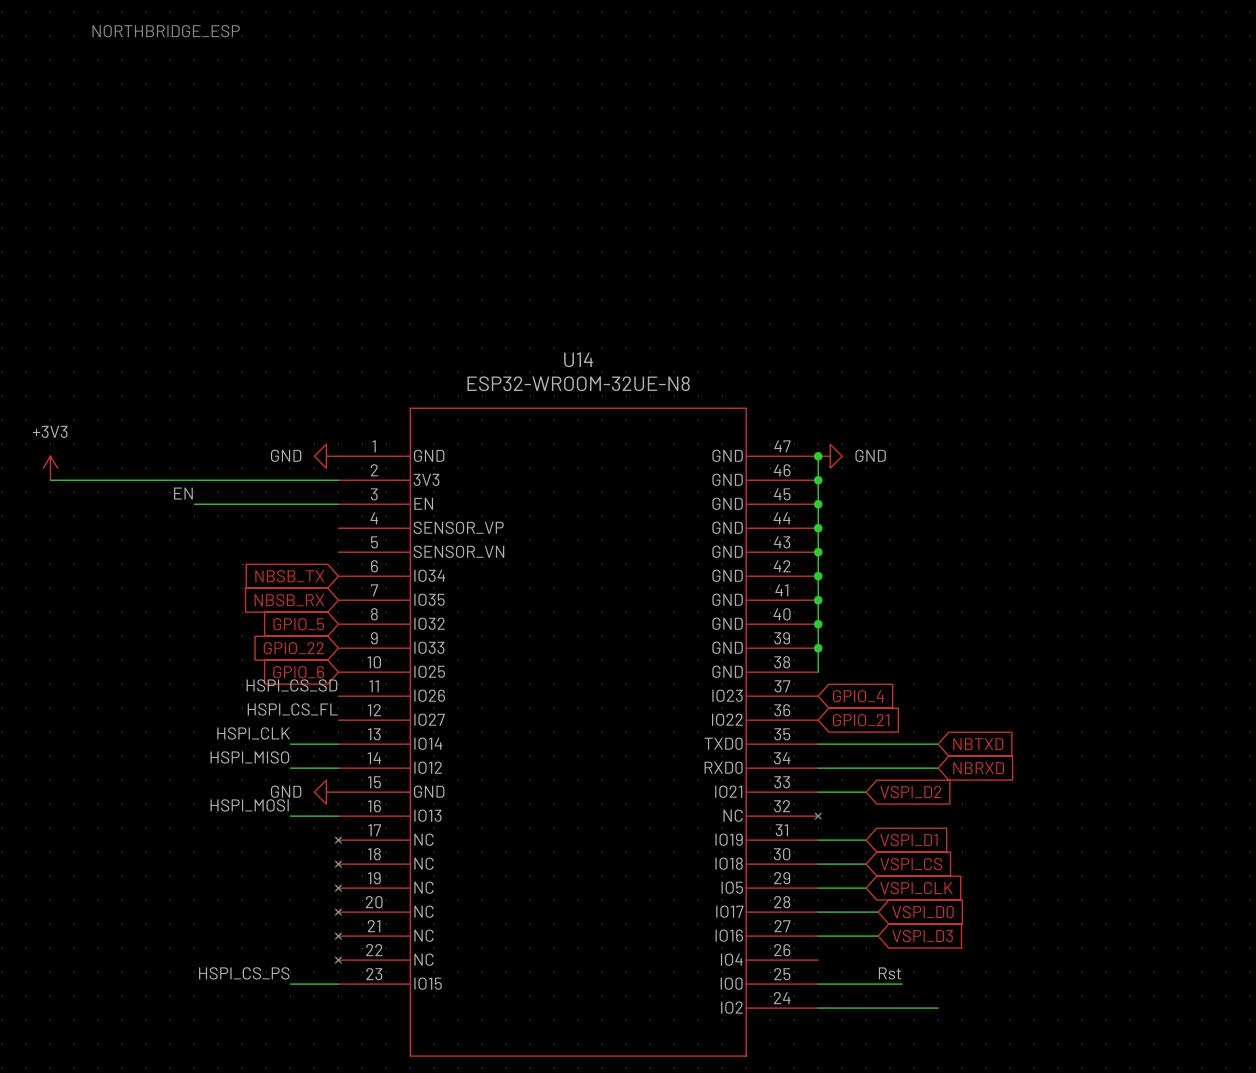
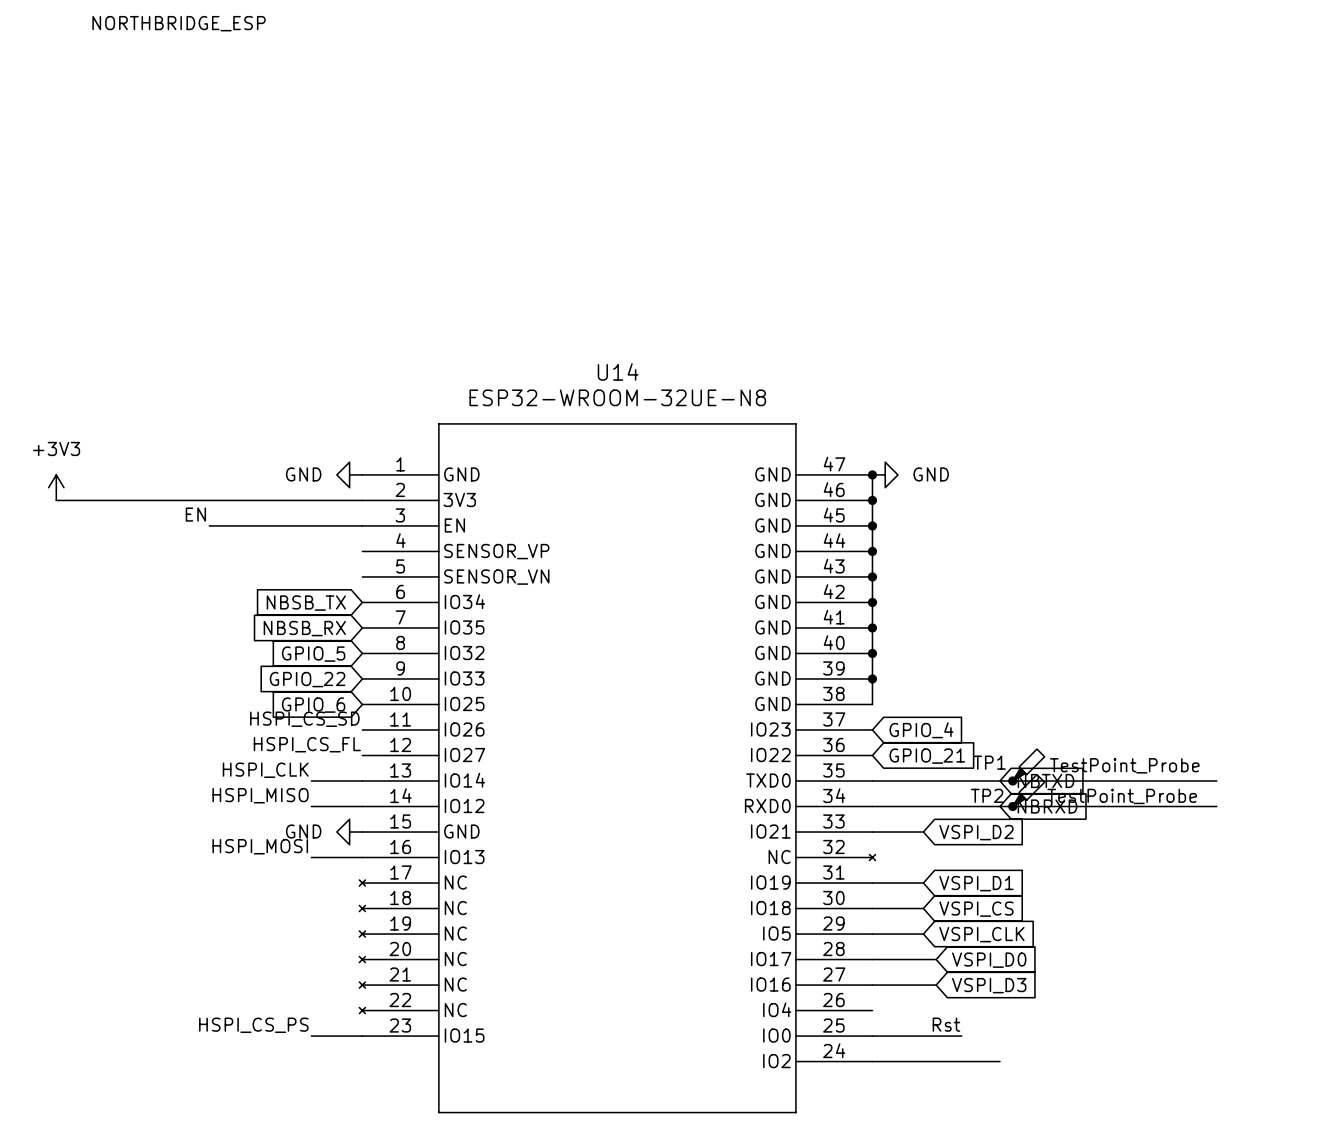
TP1: none -> TestPoint_Probe (1028, 765)
wire: none -> (999, 781) (1216, 781)
junction: none -> (1012, 781)
TP2: none -> TestPoint_Probe (1028, 790)
wire: none -> (999, 806) (1216, 806)
junction: none -> (1012, 806)

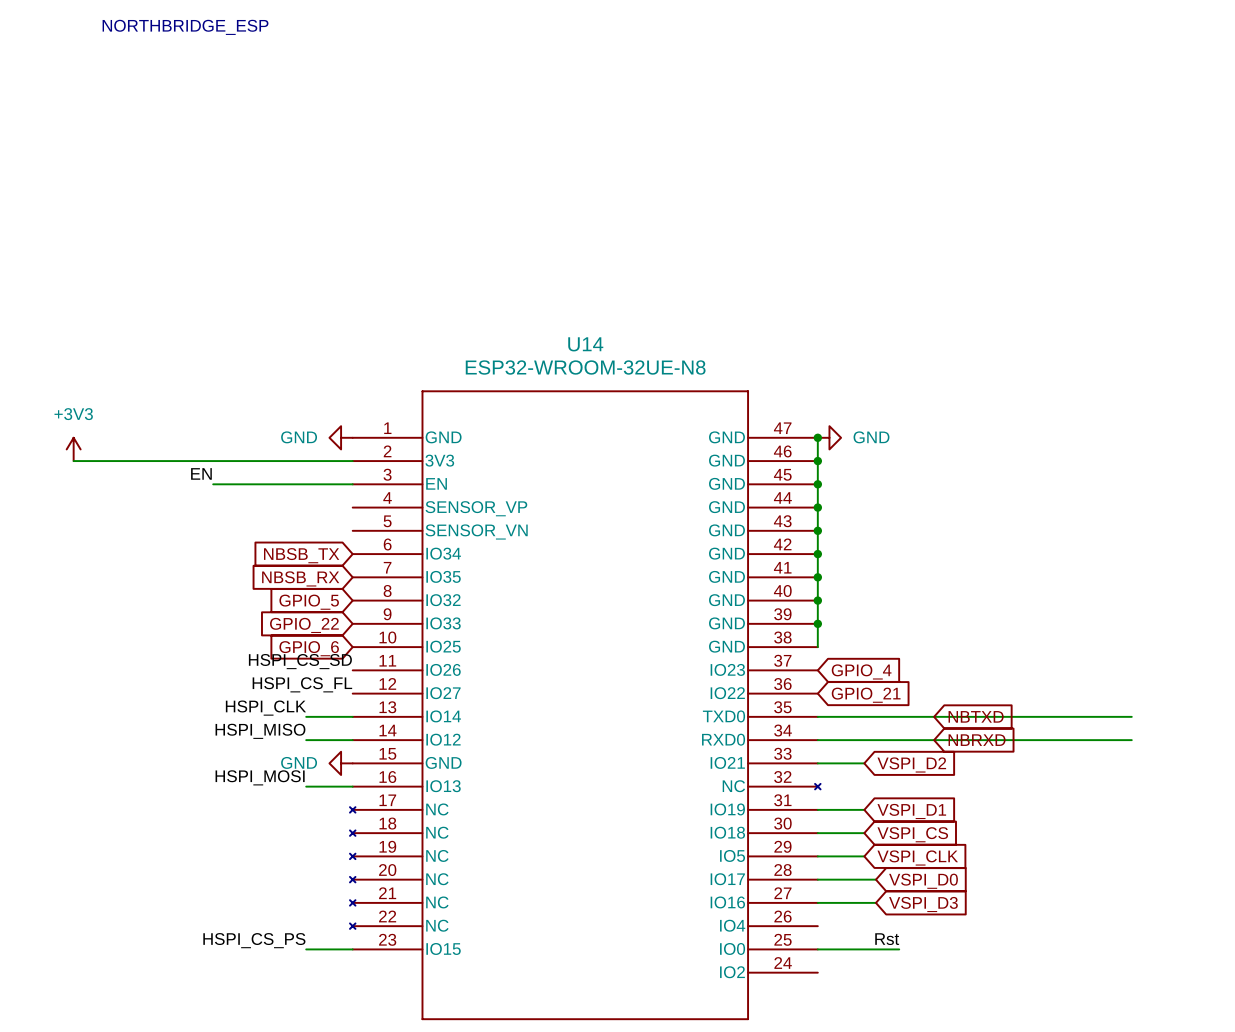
TP1: TestPoint_Probe (1028, 765) -> none
junction: (1012, 781) -> none
TP2: TestPoint_Probe (1028, 790) -> none
junction: (1012, 806) -> none
wire: (872, 1061) (999, 1061) -> none

